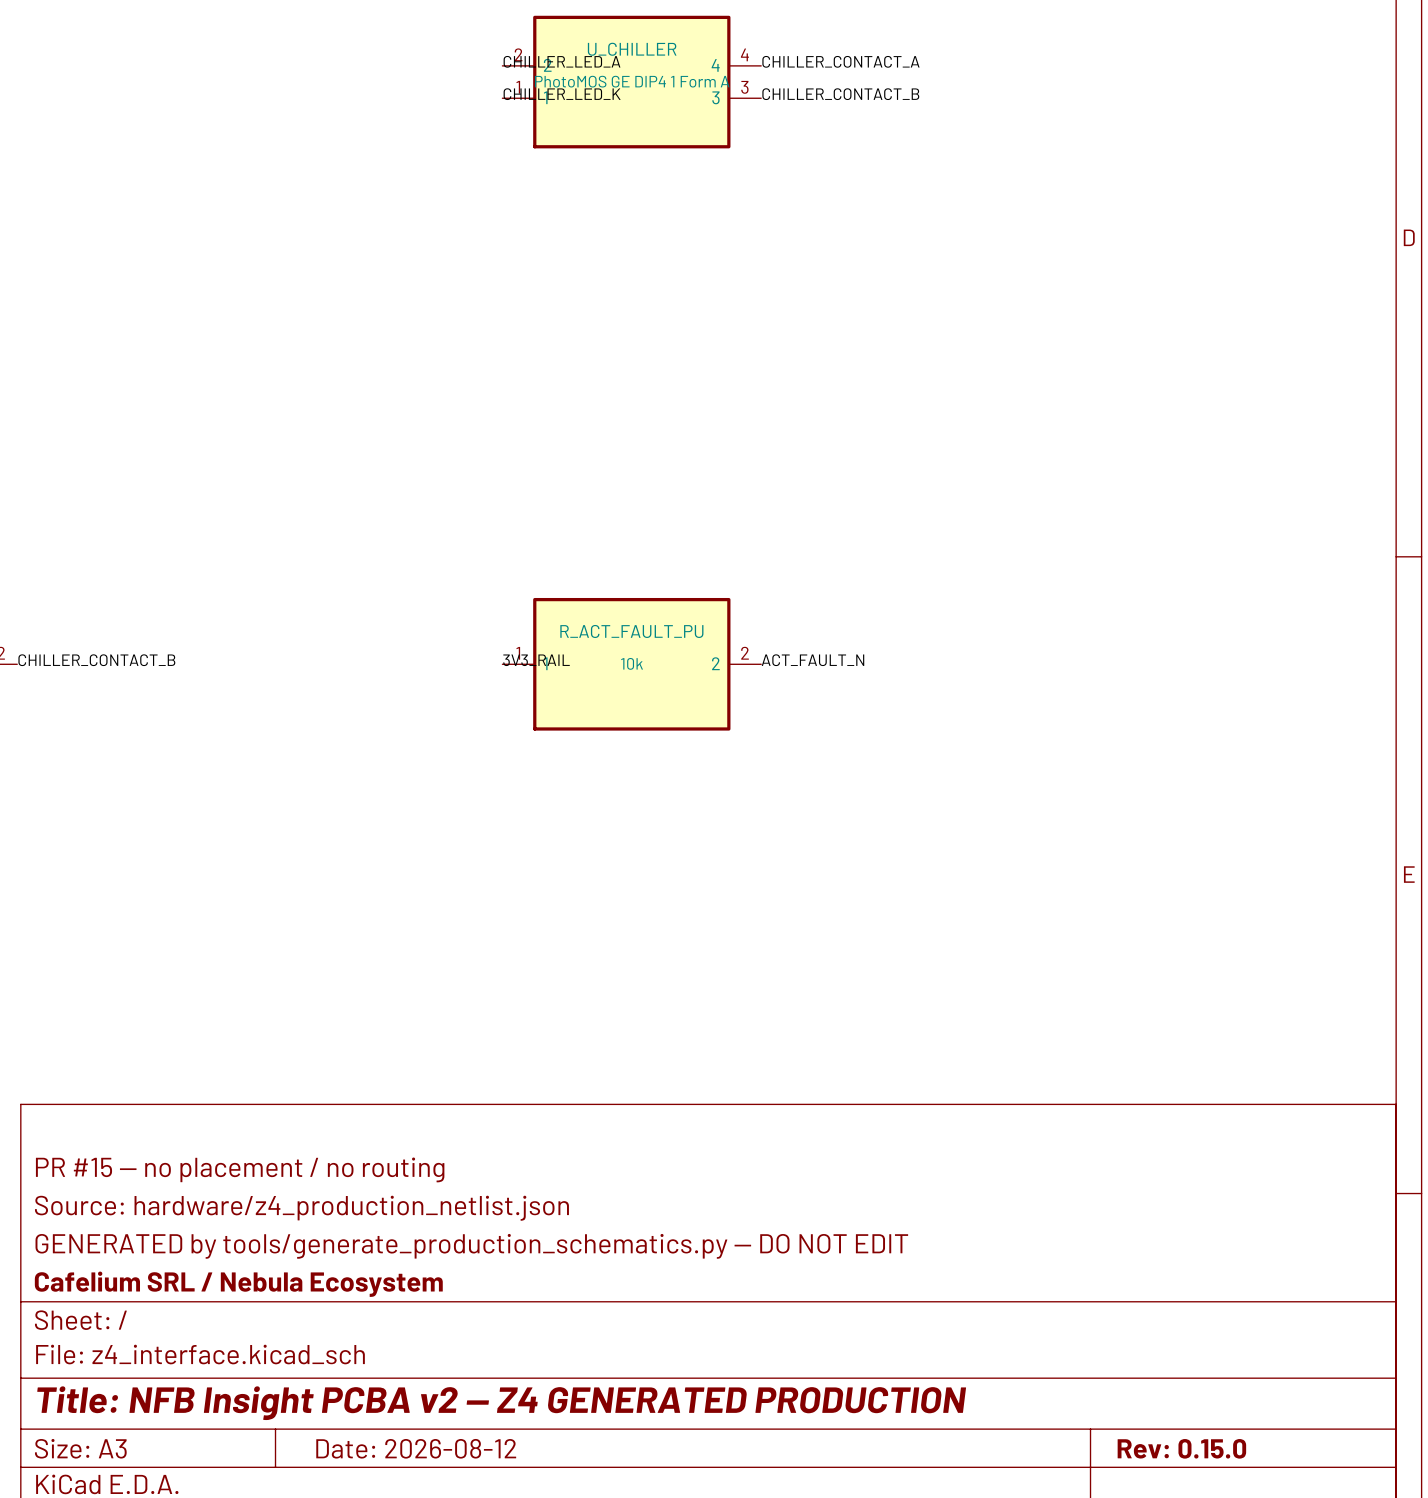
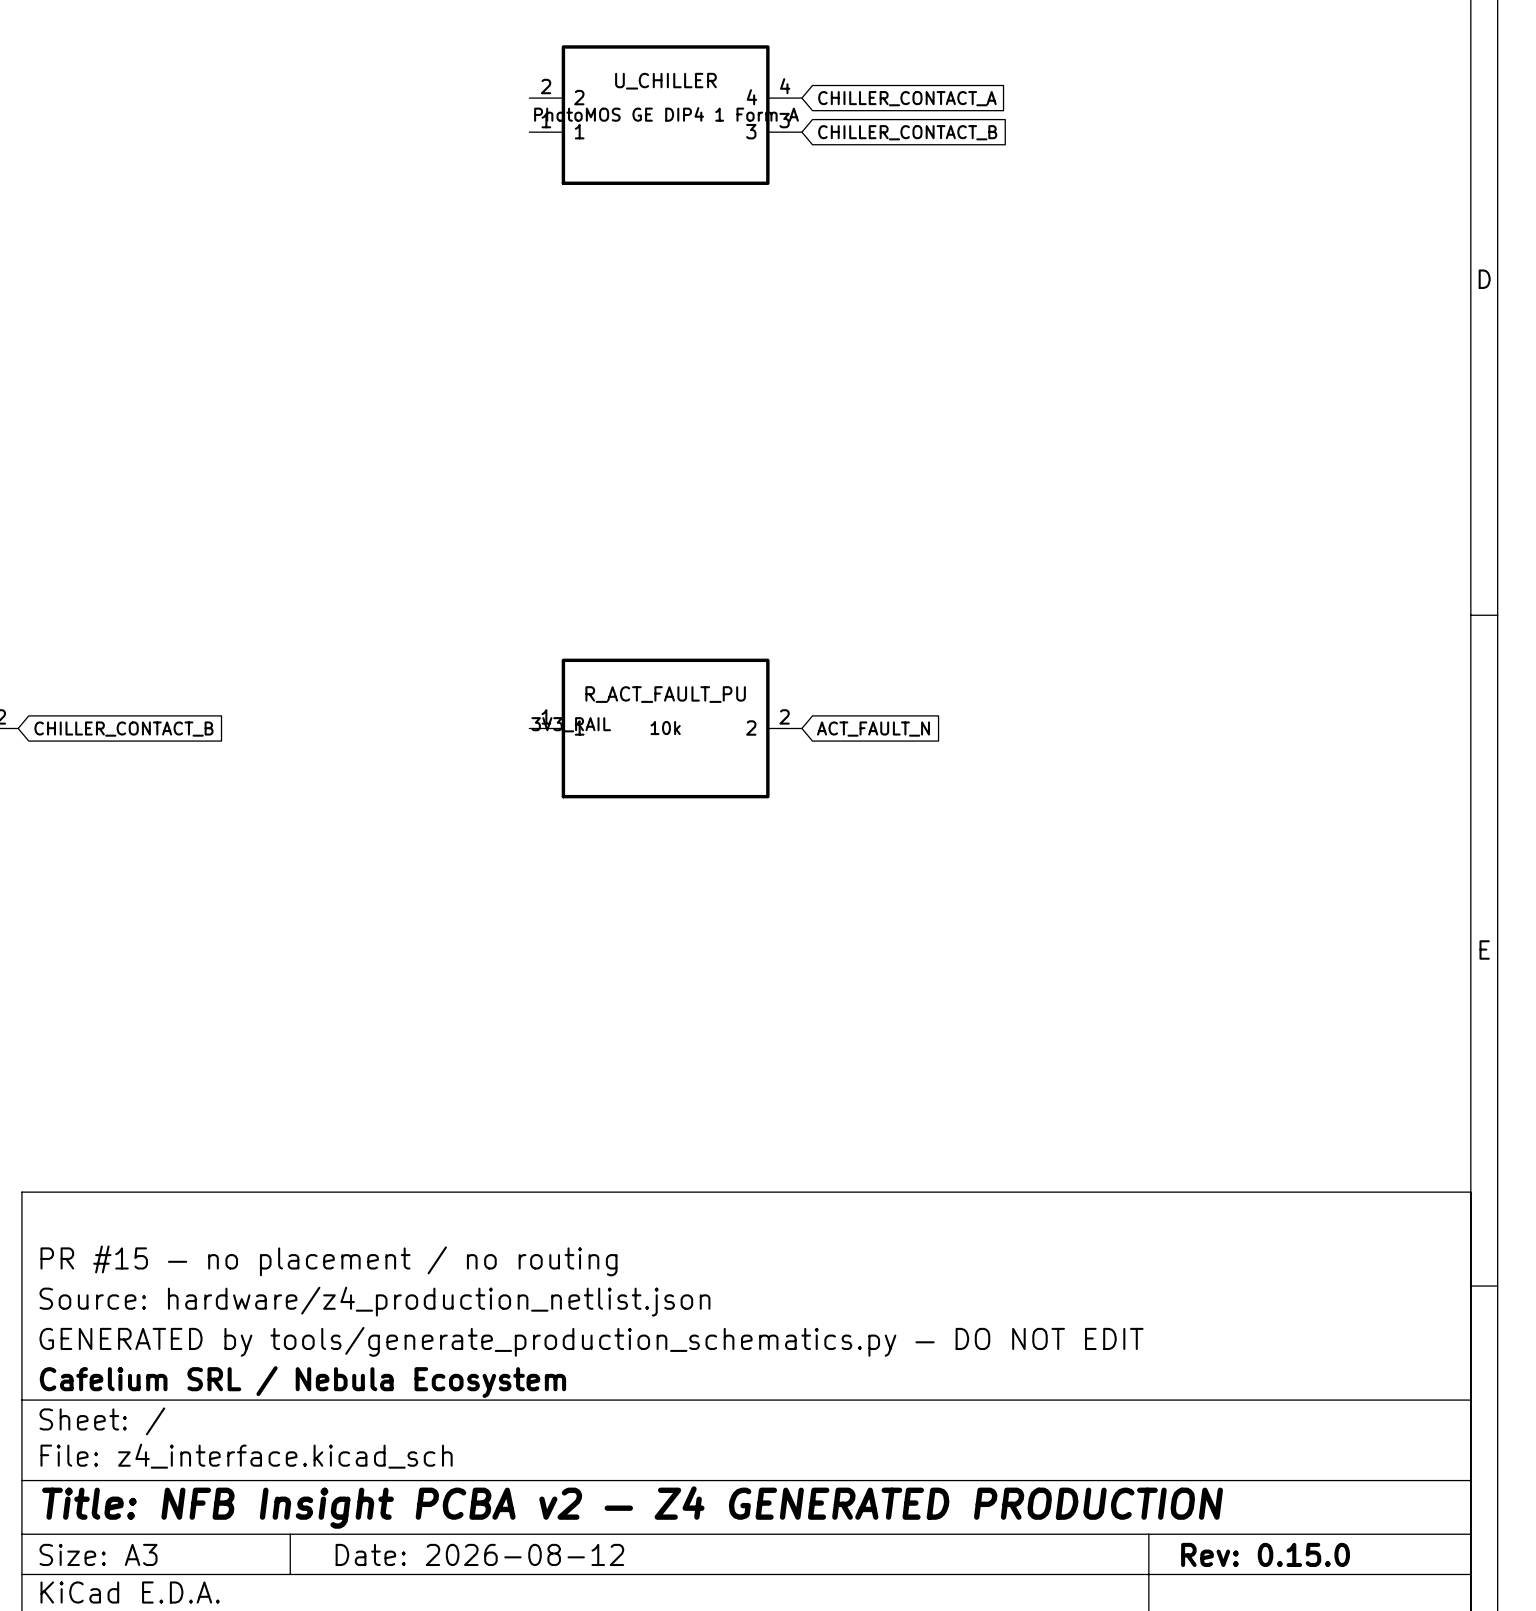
label: CHILLER_LED_A (562, 61) -> none
label: CHILLER_CONTACT_A (840, 61) -> none
global label: none -> CHILLER_CONTACT_A (907, 98)
label: CHILLER_LED_K (562, 94) -> none
label: CHILLER_CONTACT_B (840, 94) -> none
global label: none -> CHILLER_CONTACT_B (907, 132)
label: CHILLER_CONTACT_B (96, 660) -> none
label: ACT_FAULT_N (812, 660) -> none
global label: none -> CHILLER_CONTACT_B (123, 729)
global label: none -> ACT_FAULT_N (873, 729)

